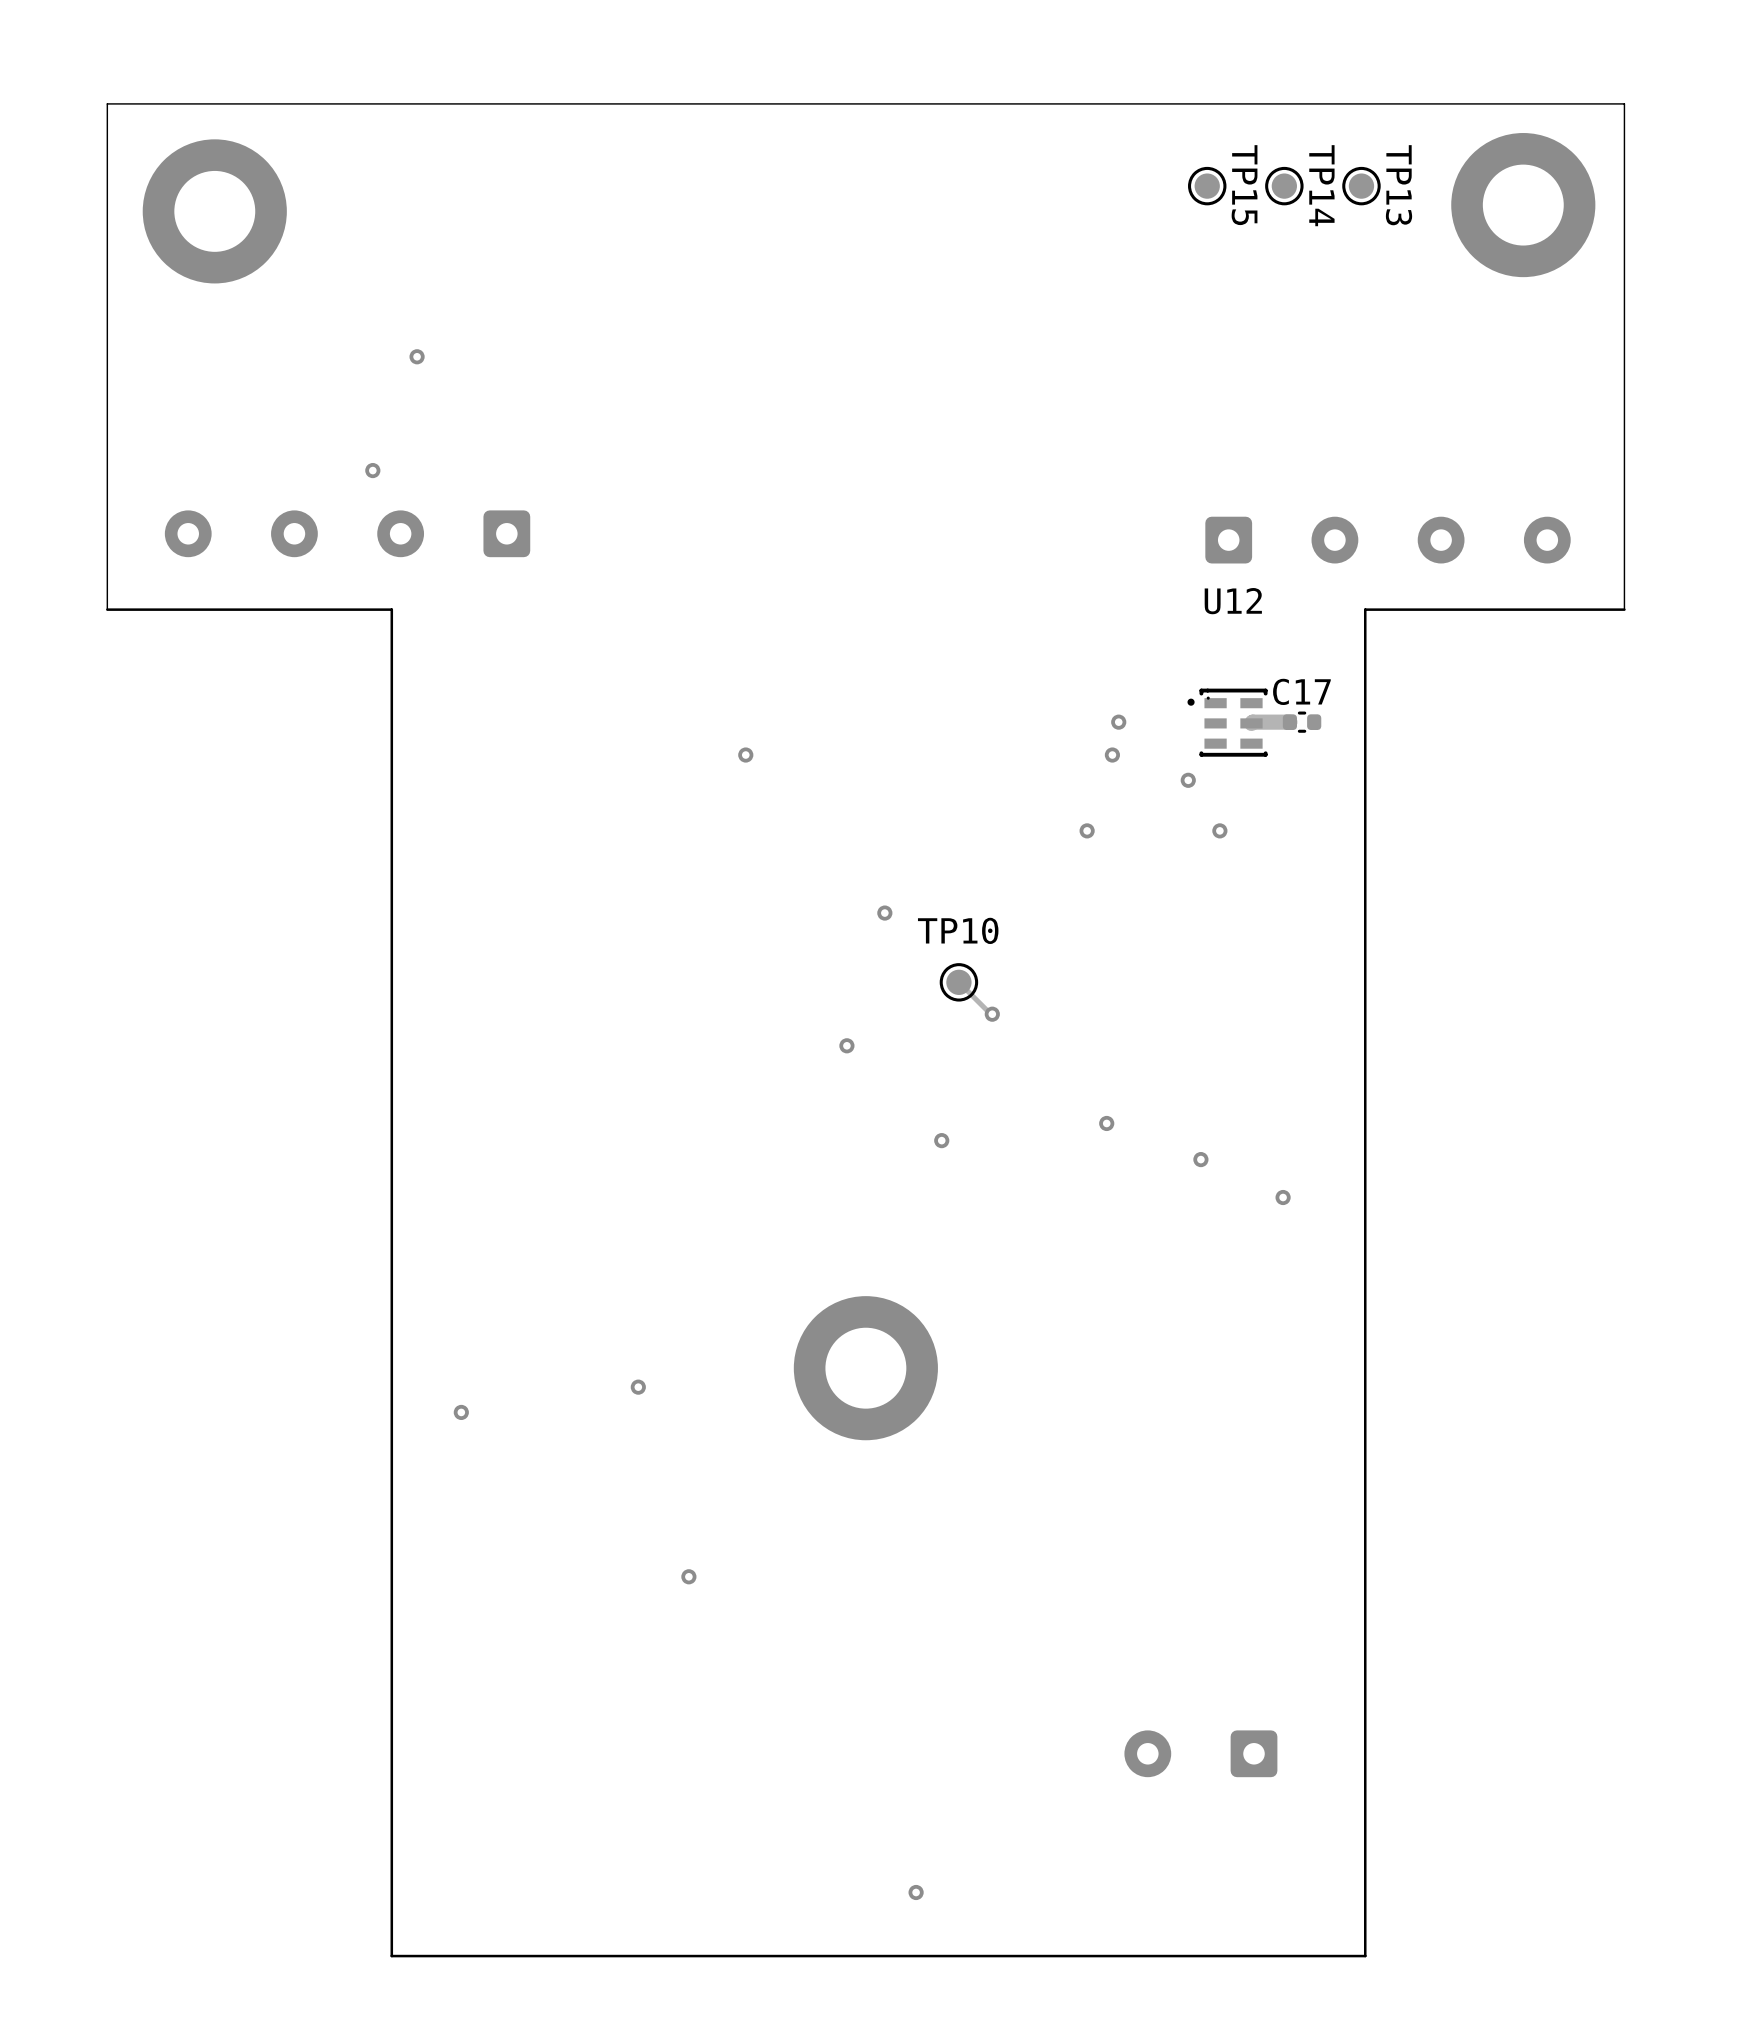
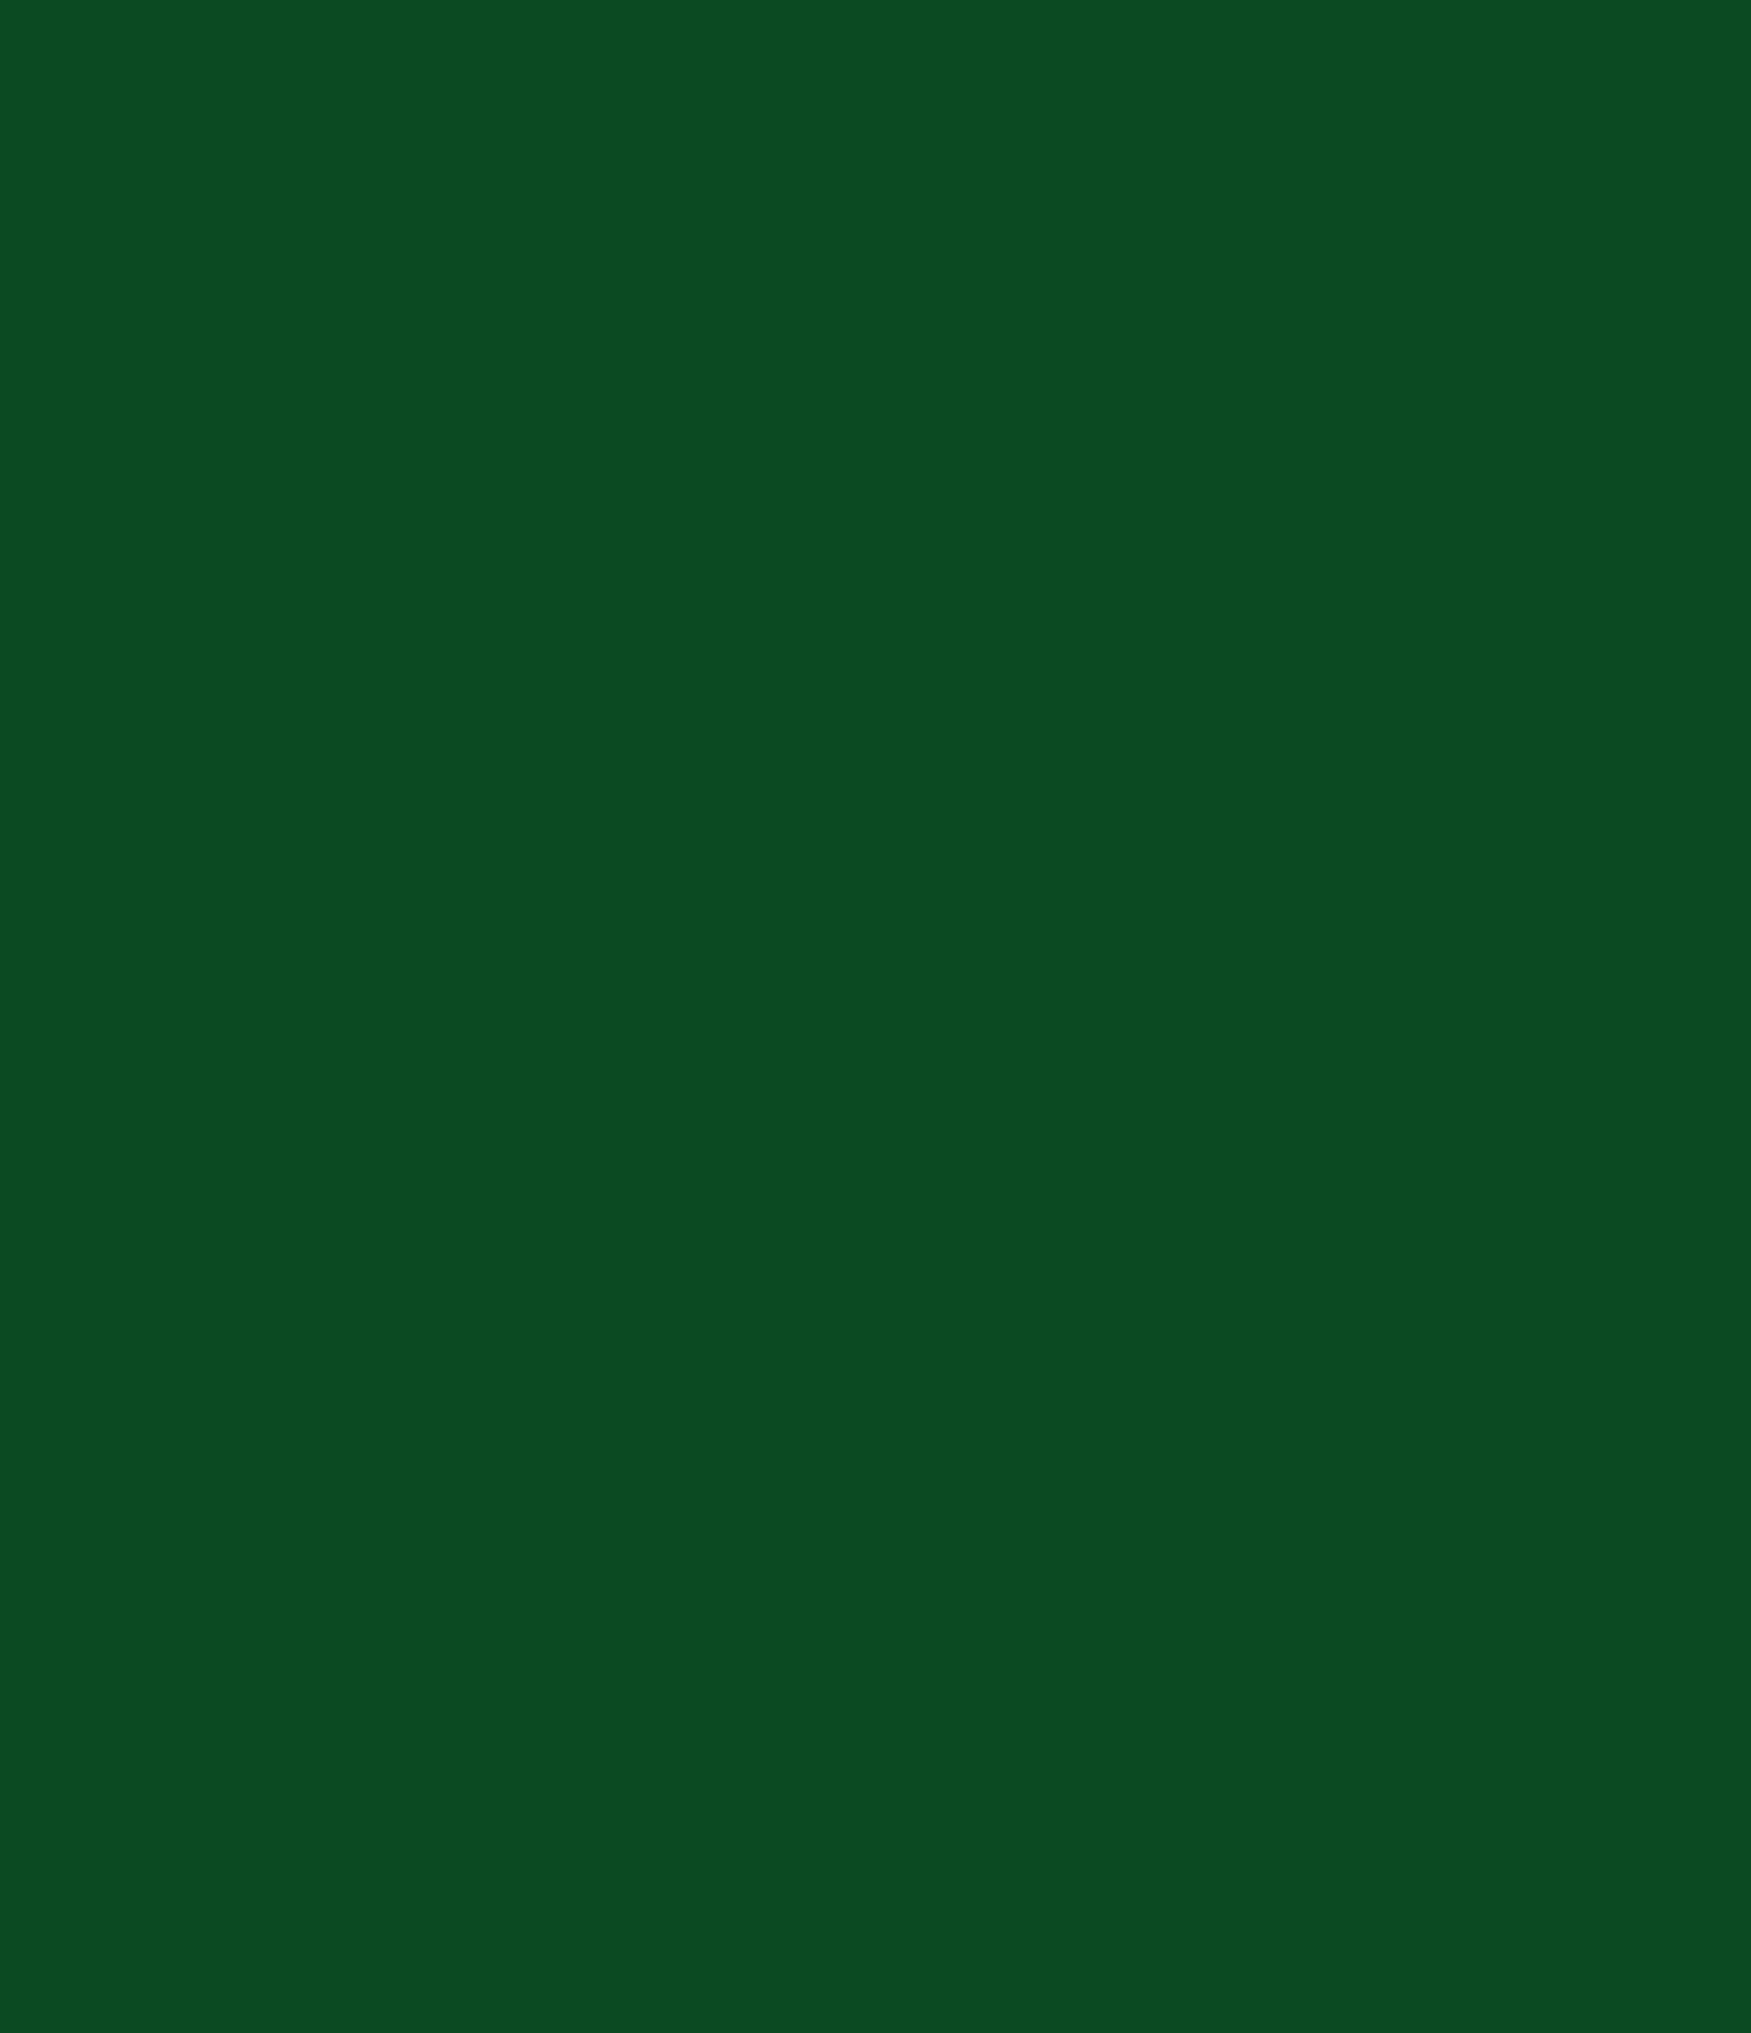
board edge: (1624, 103) (1624, 609) (1365, 609) (1365, 1956) (391, 1956) (391, 609) (107, 609) (107, 103) (1624, 103) -> none
TP15: (1207, 186) -> none
TP14: (1284, 186) -> none
TP13: (1361, 186) -> none
part: (1523, 205) -> none
part: (214, 211) -> none
via: (417, 356) -> none
via: (372, 470) -> none
part: (347, 533) -> none
part: (1388, 540) -> none
via: (1118, 722) -> none
U12: (1227, 722) -> none
track: (1289, 722) (1251, 723) -> none
C17: (1302, 722) -> none
via: (745, 755) -> none
via: (1112, 755) -> none
via: (1188, 780) -> none
via: (1087, 830) -> none
via: (1219, 830) -> none
via: (884, 913) -> none
track: (958, 982) (992, 1014) -> none
TP10: (958, 982) -> none
via: (992, 1014) -> none
via: (846, 1045) -> none
via: (1106, 1123) -> none
via: (941, 1140) -> none
via: (1200, 1159) -> none
via: (1283, 1197) -> none
part: (865, 1368) -> none
via: (638, 1387) -> none
via: (461, 1412) -> none
via: (688, 1576) -> none
part: (1200, 1753) -> none
via: (916, 1892) -> none

